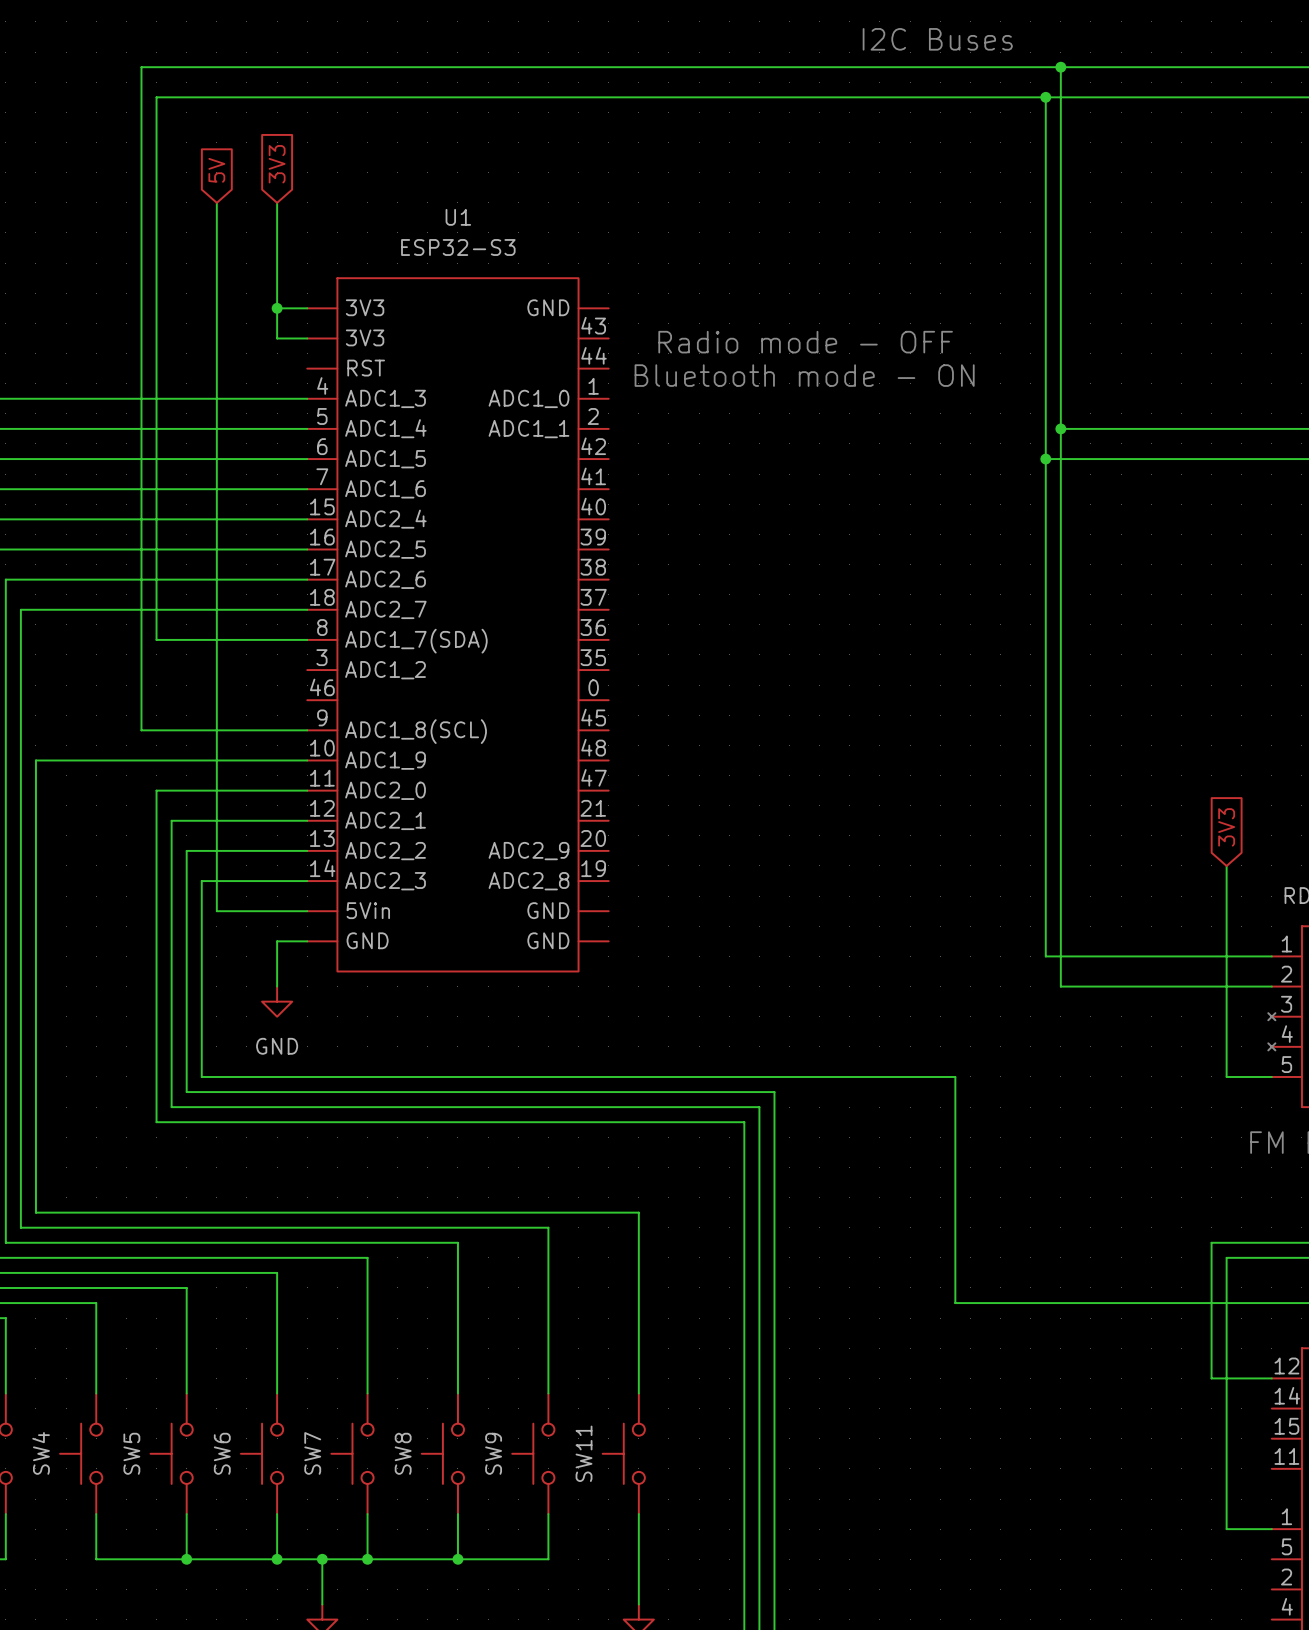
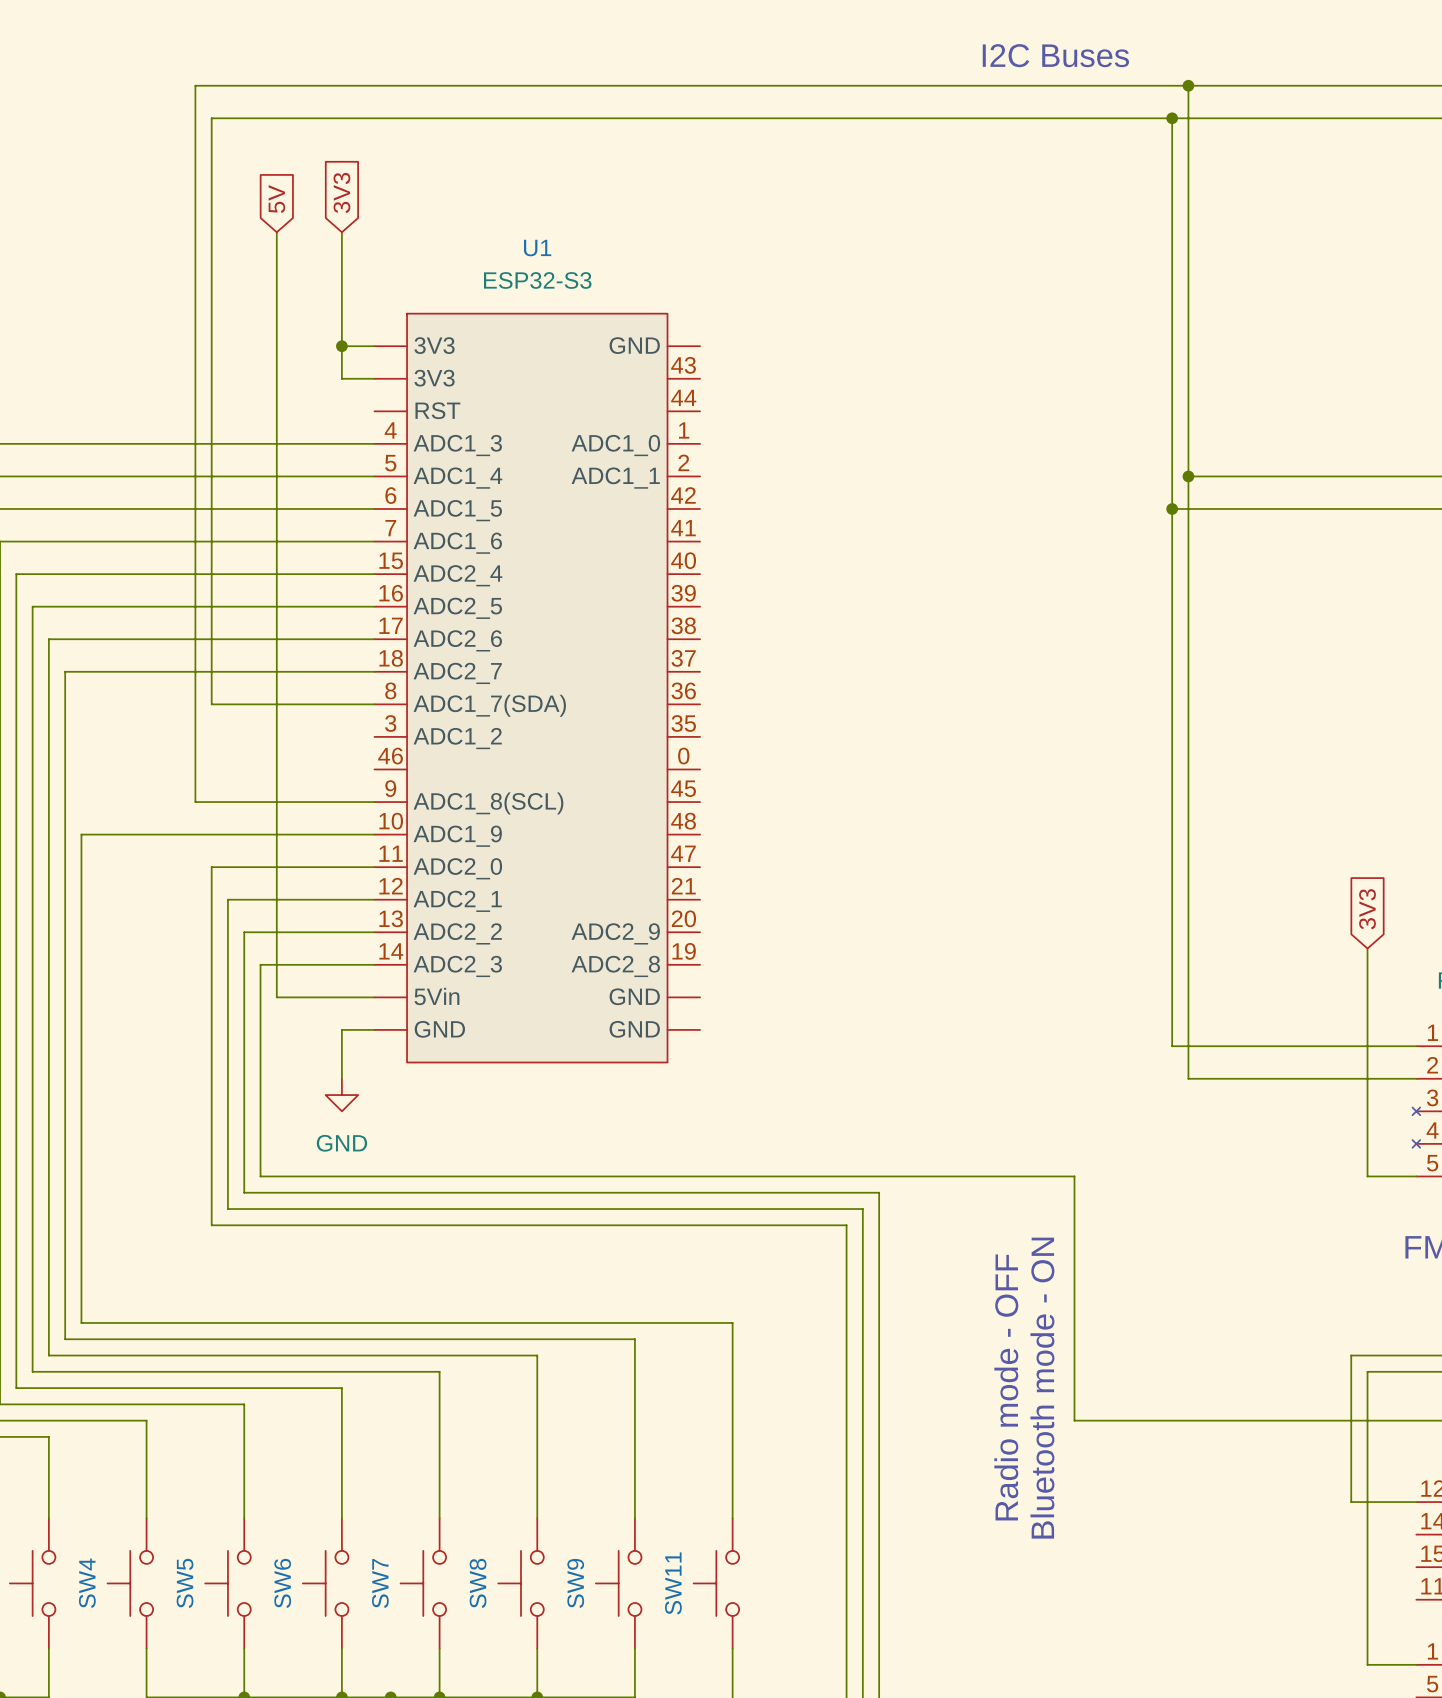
text: Radio mode - OFF (805, 342) -> none
text: Bluetooth mode - ON (804, 375) -> none
text: none -> Radio mode - OFF (1006, 1387)
text: none -> Bluetooth mode - ON (1042, 1388)

